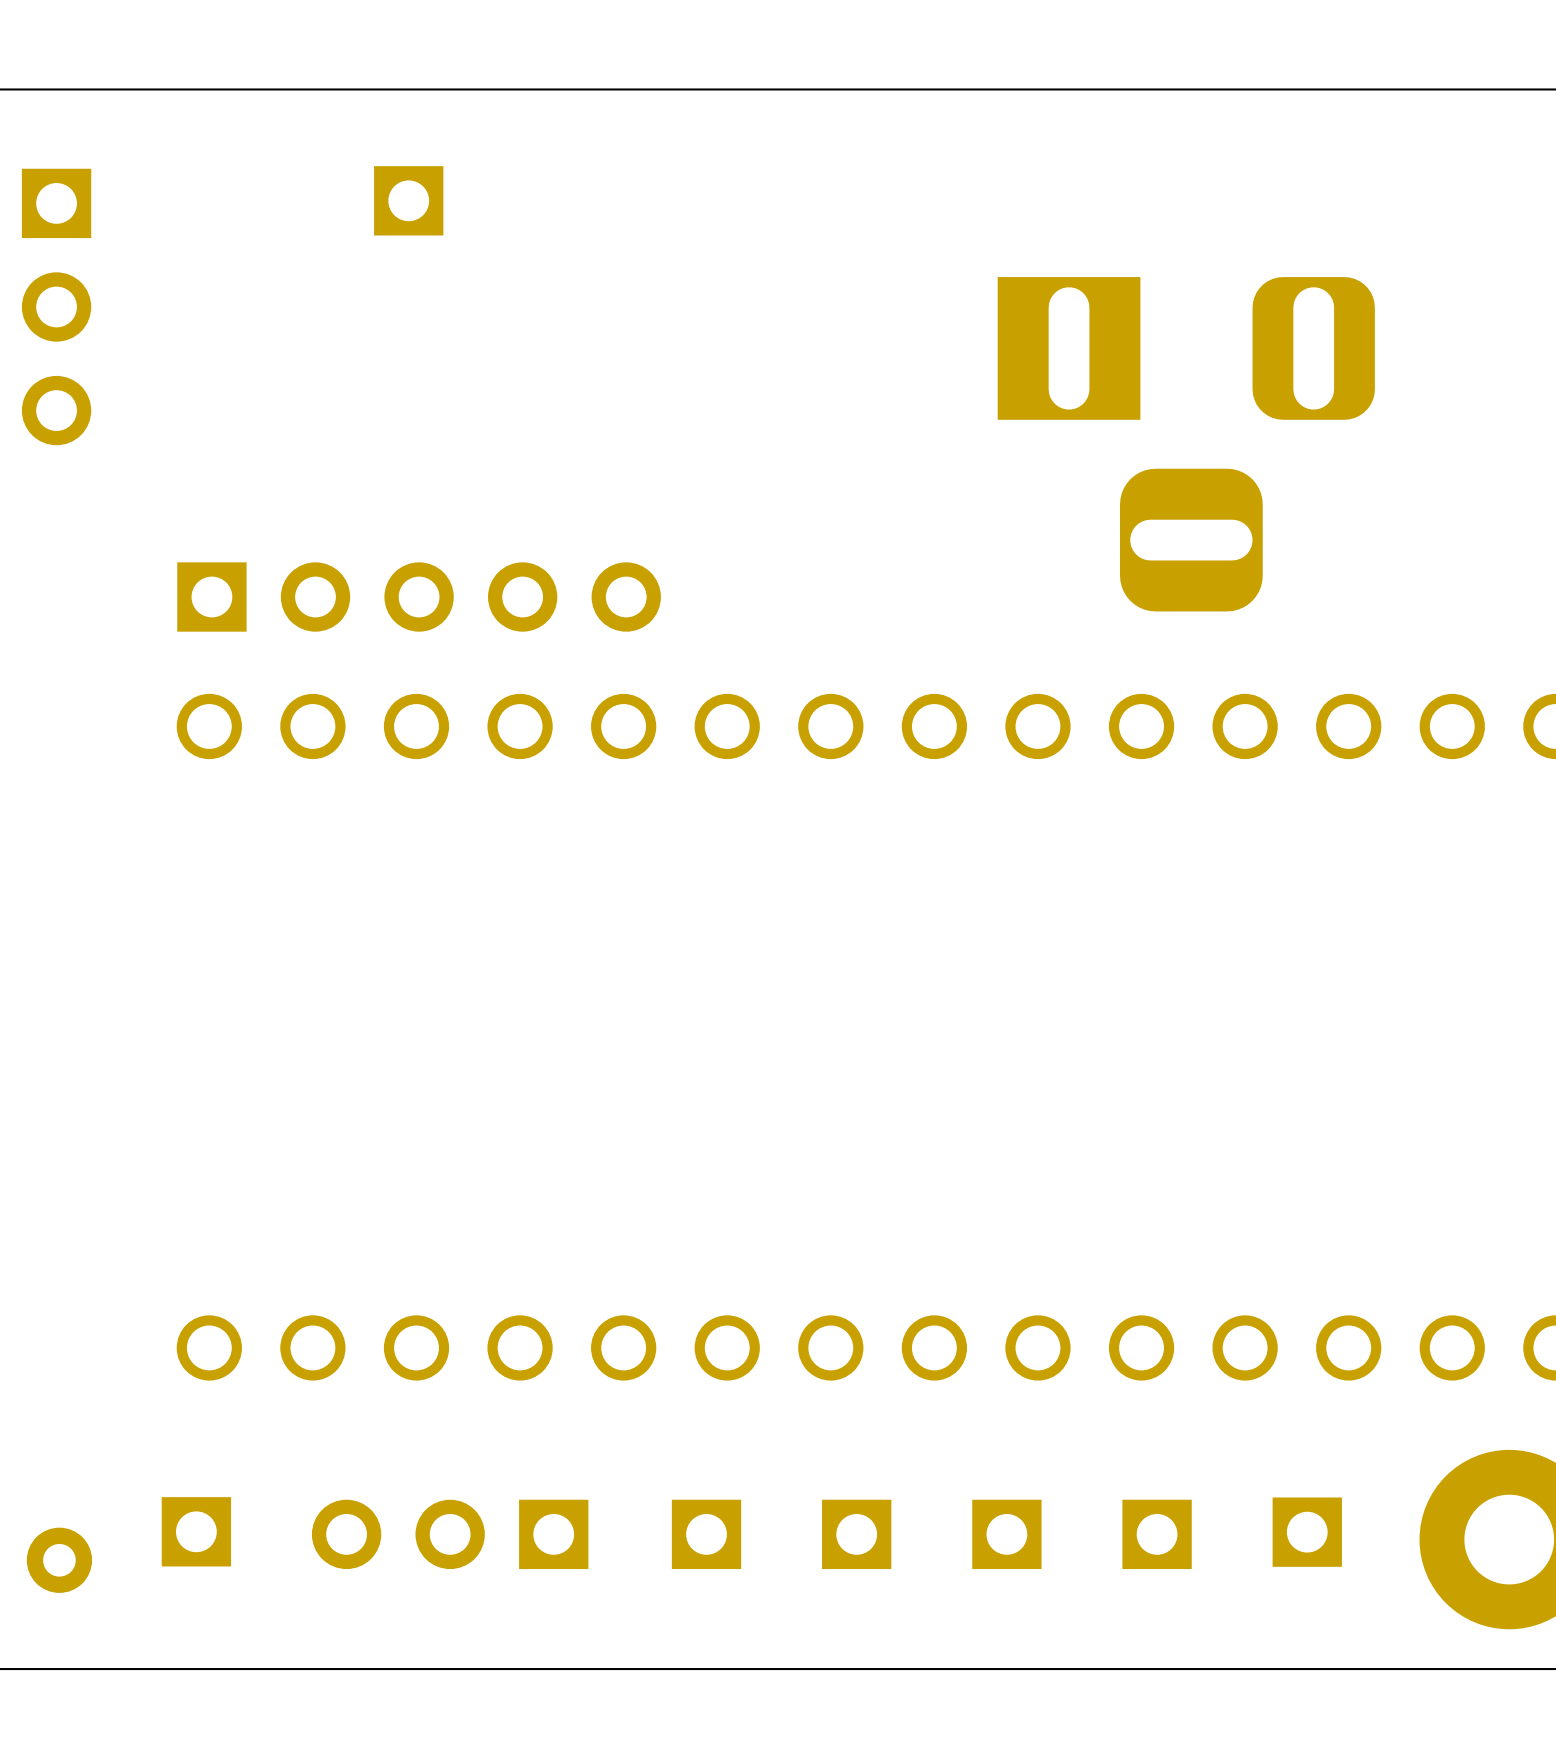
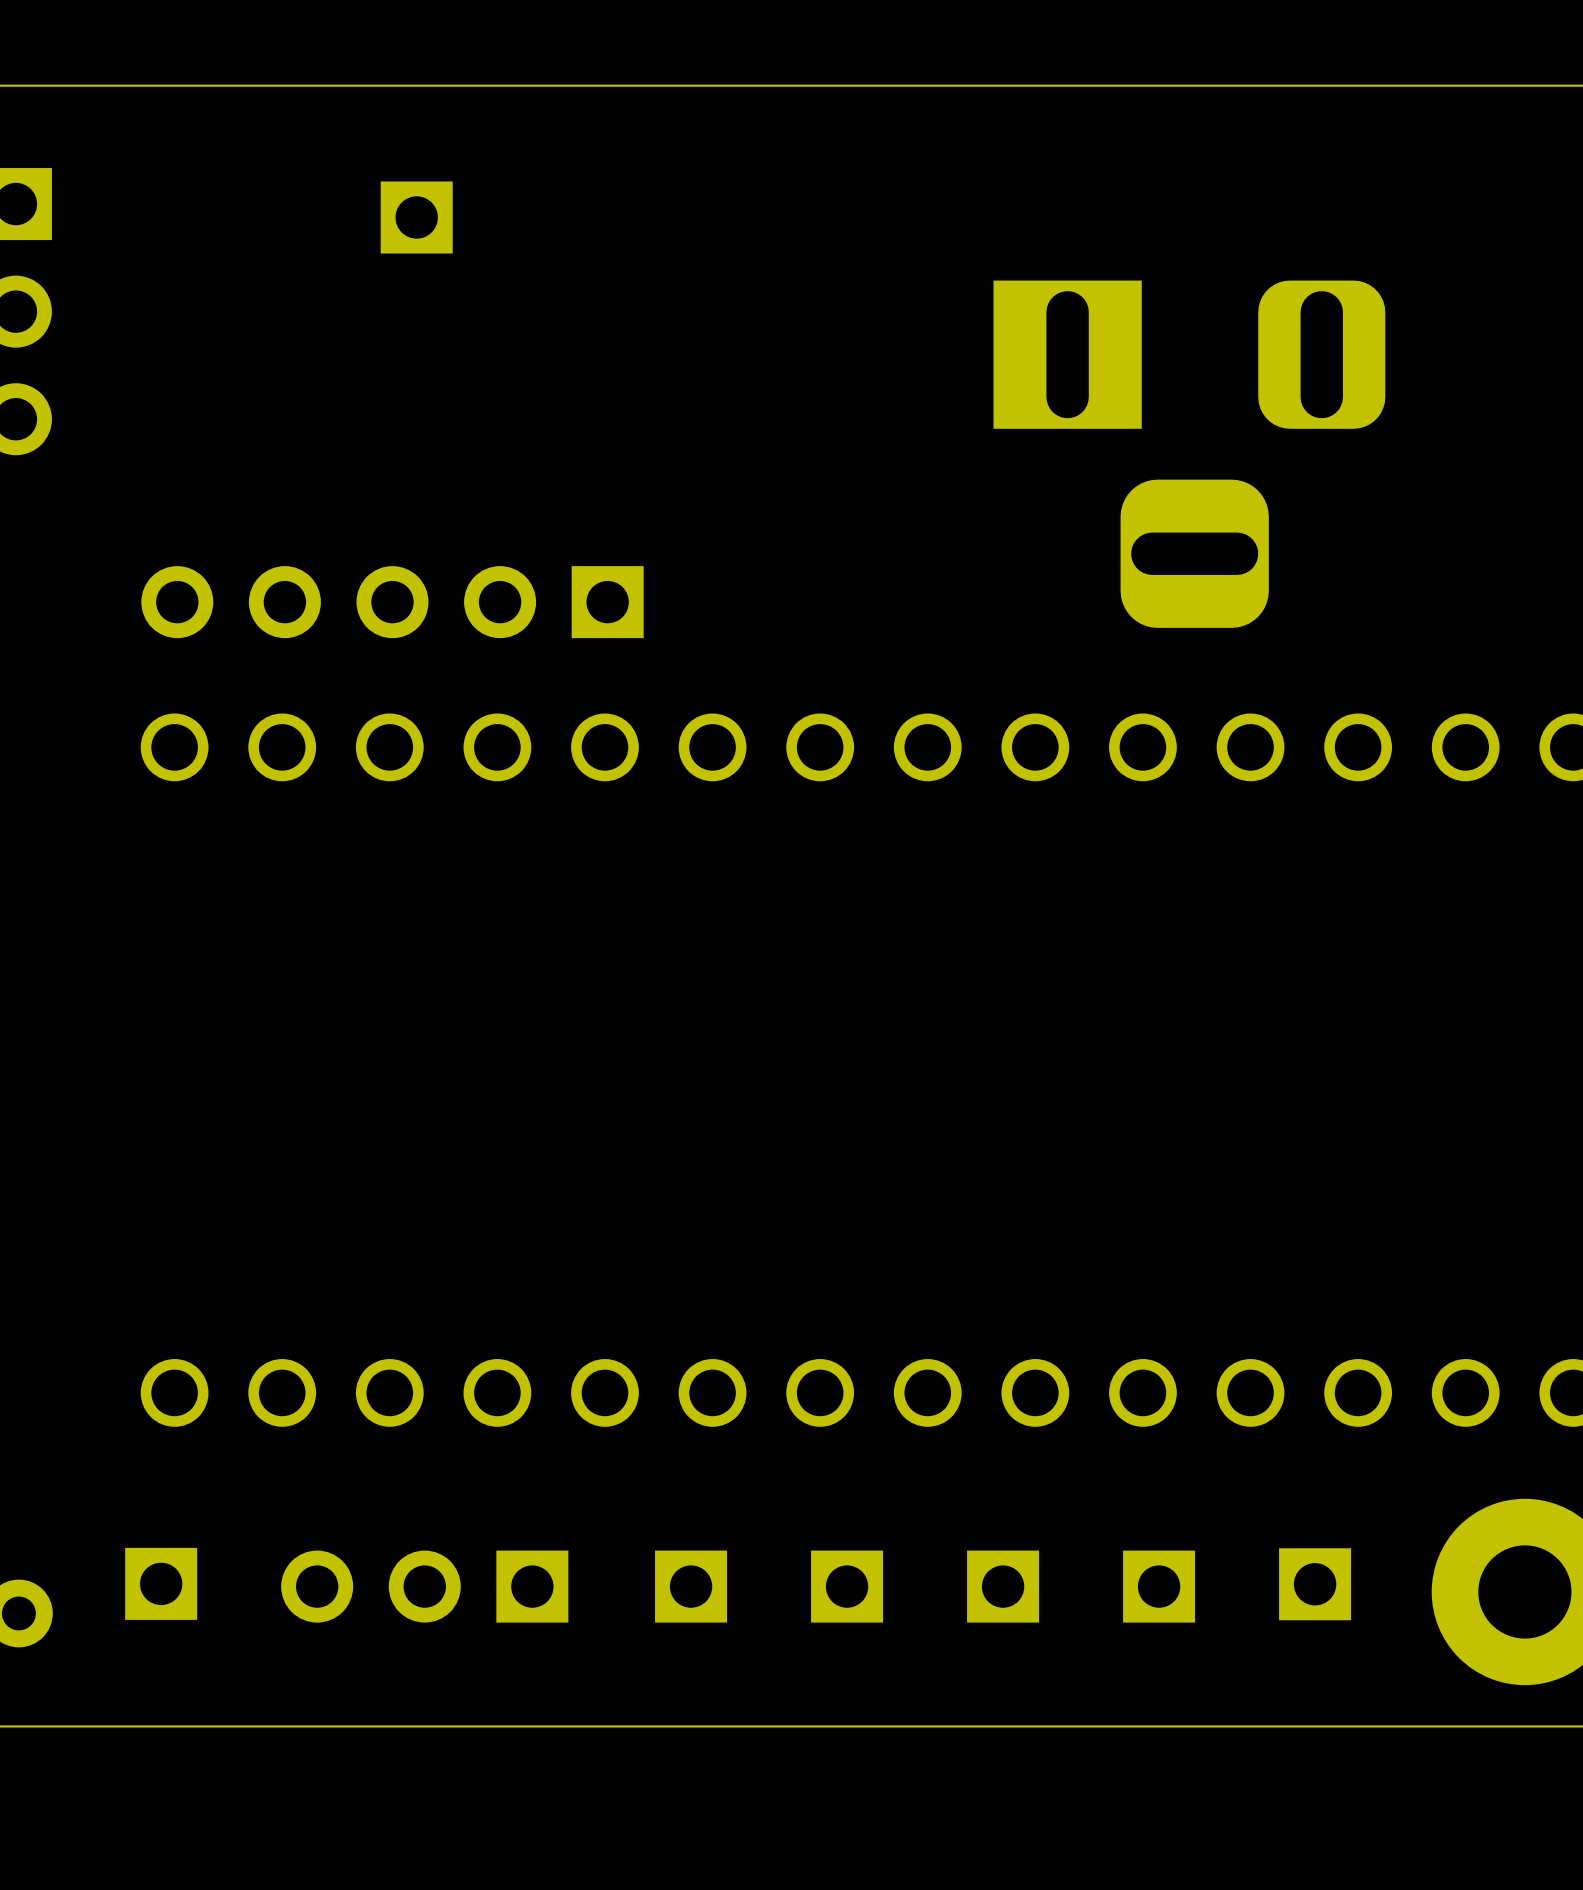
part position: (408, 200) -> (416, 217)
part rotation: 0° (419, 597) -> 180° (392, 602)

